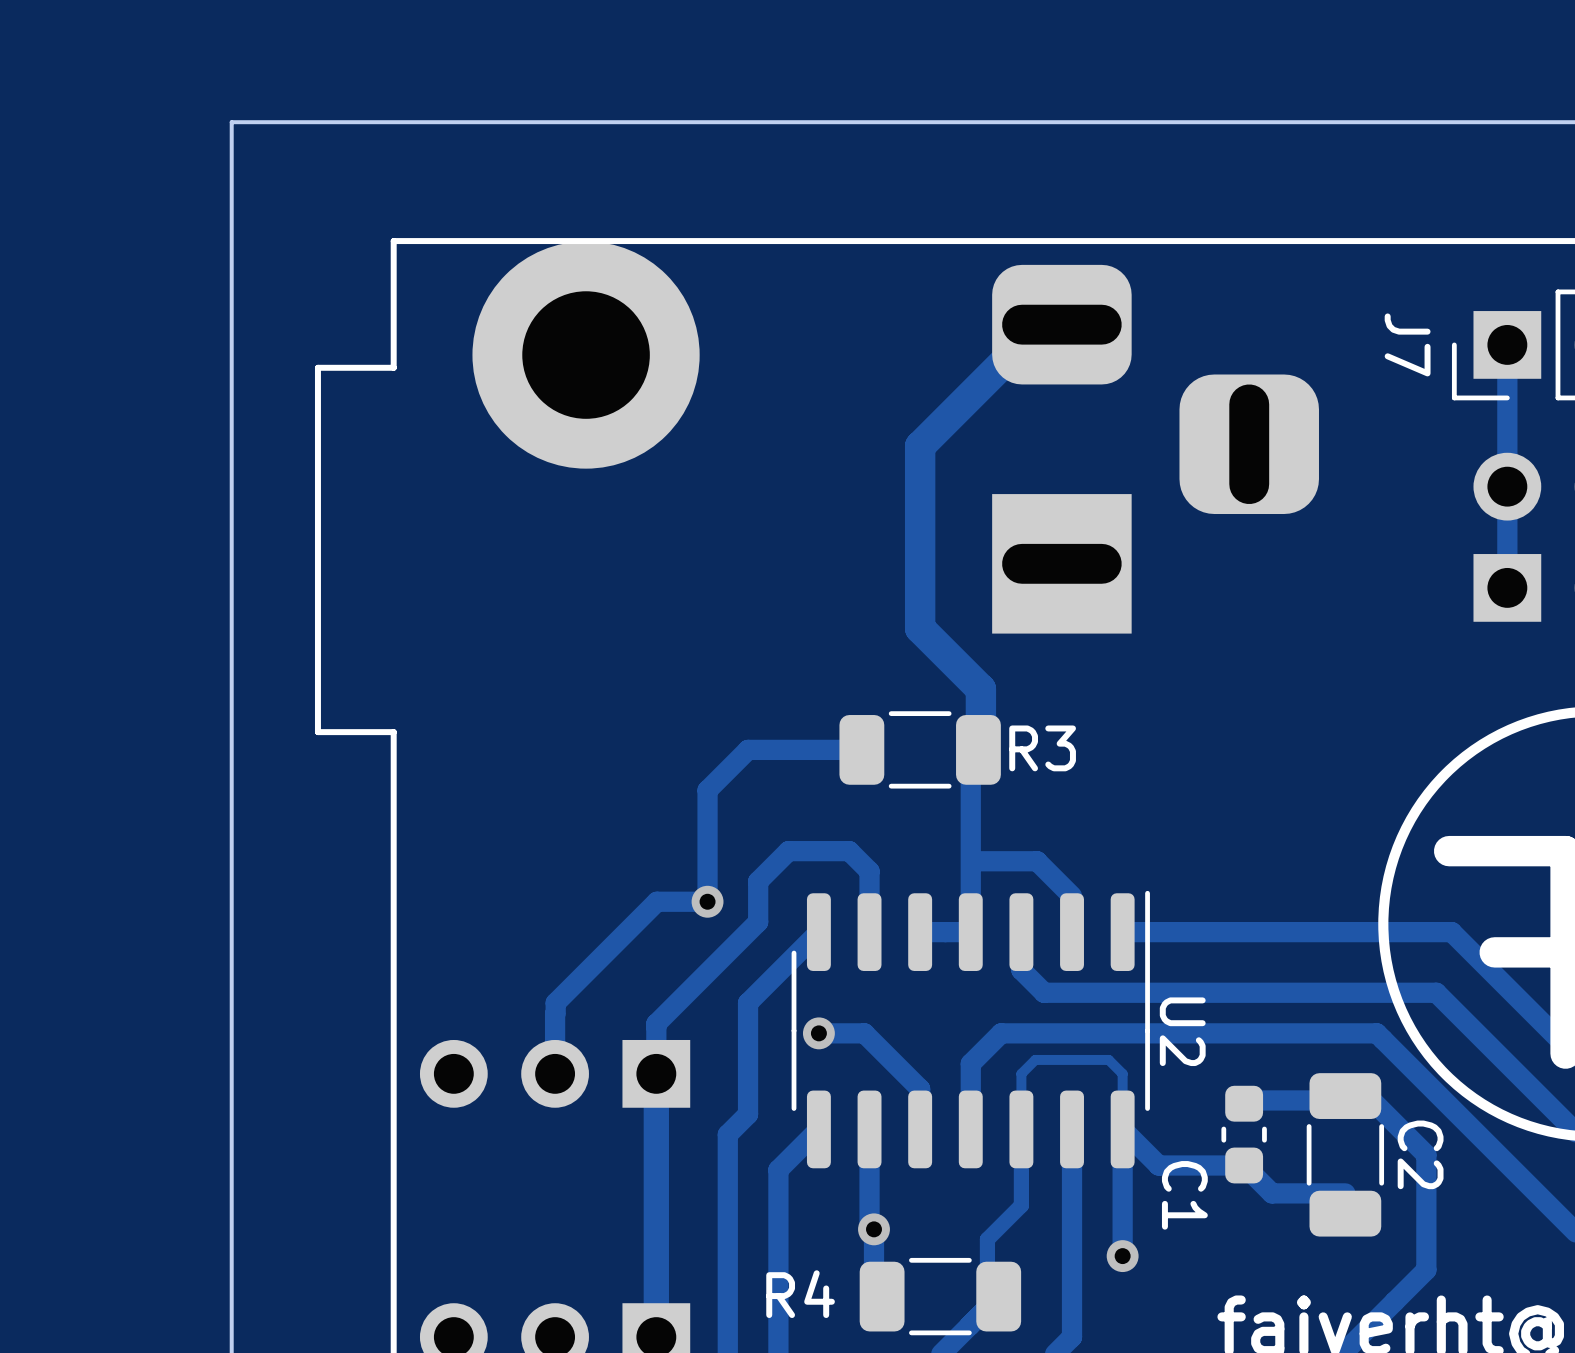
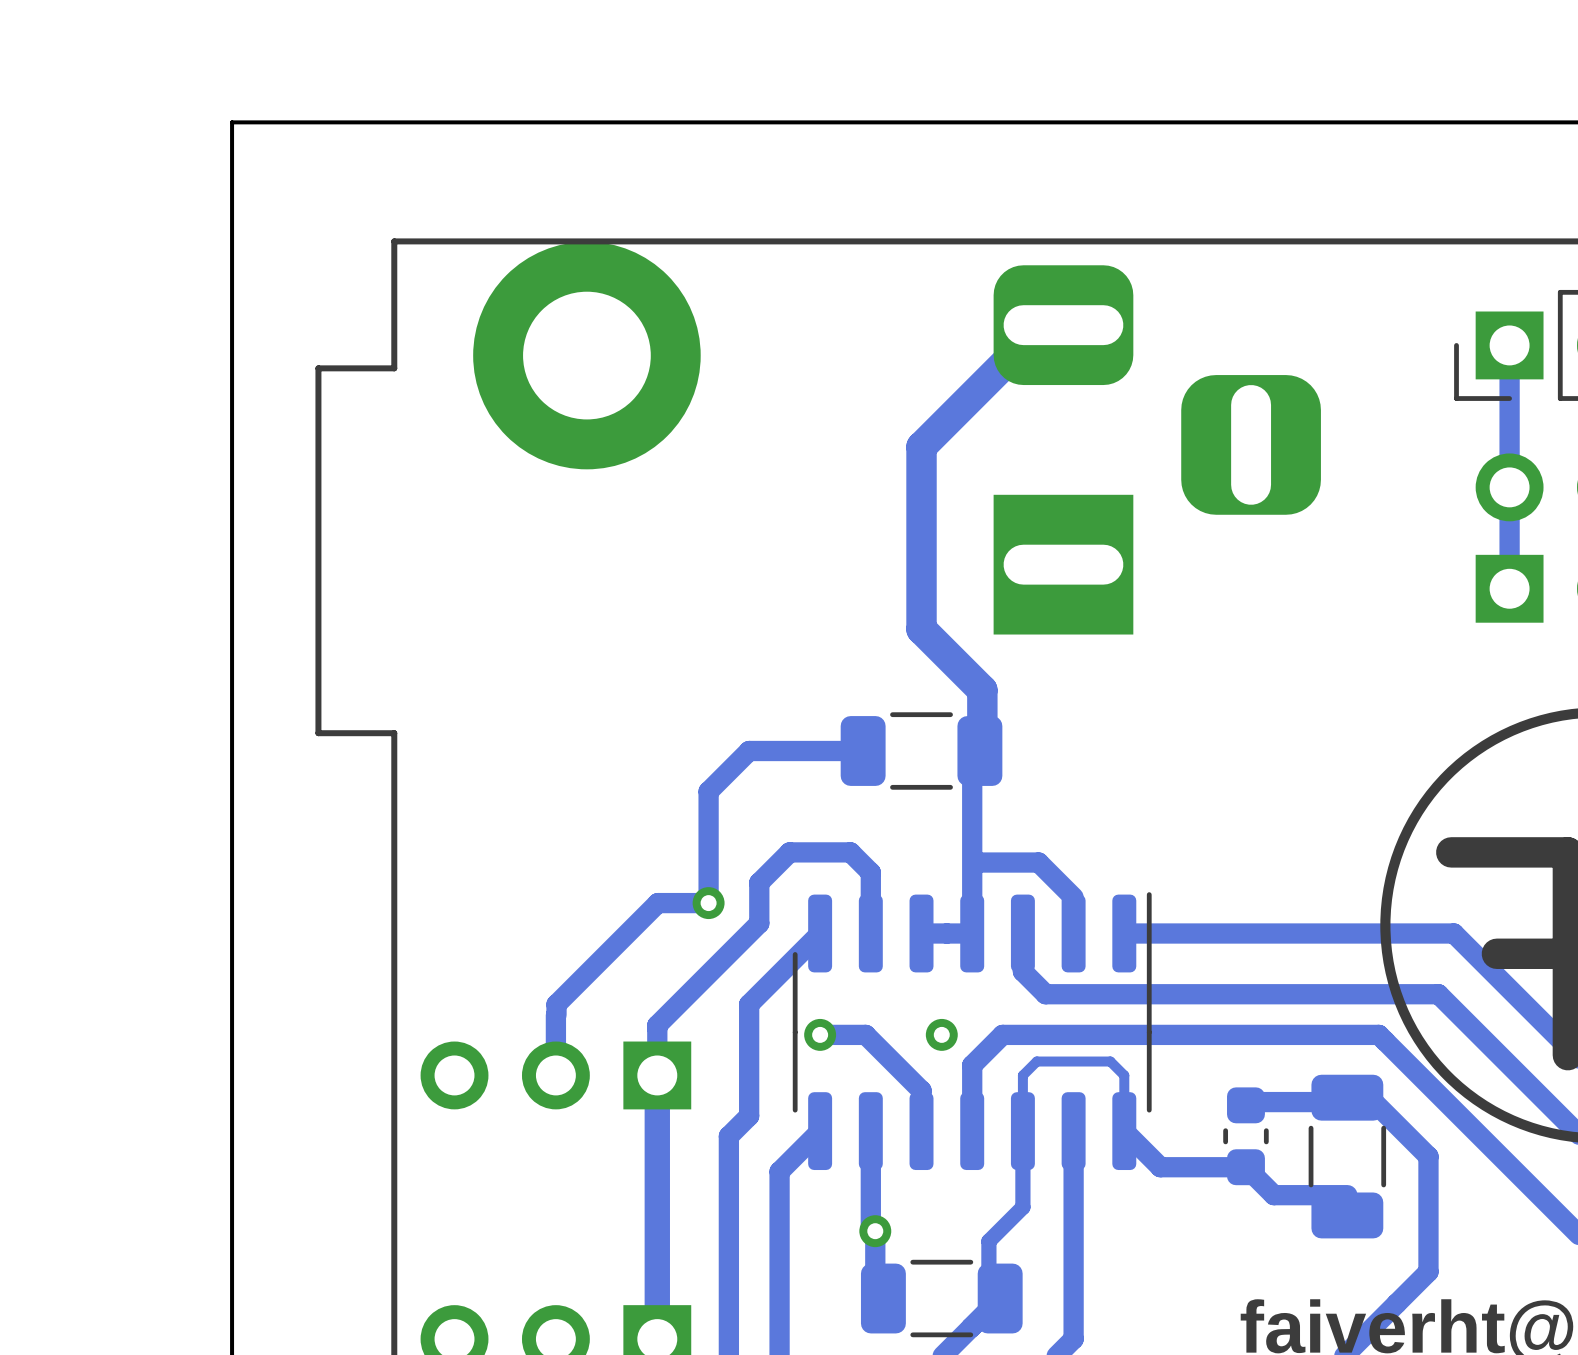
J7 name: J7 (1407, 344) -> none
R3 name: R3 (1042, 748) -> none
U2 name: U2 (1182, 1031) -> none
via: none -> (941, 1034)
track: (1122, 1129) (1122, 1256) -> none
C2 name: C2 (1420, 1154) -> none
C1 name: C1 (1184, 1195) -> none
via: (1122, 1256) -> none
R4 name: R4 (800, 1294) -> none

